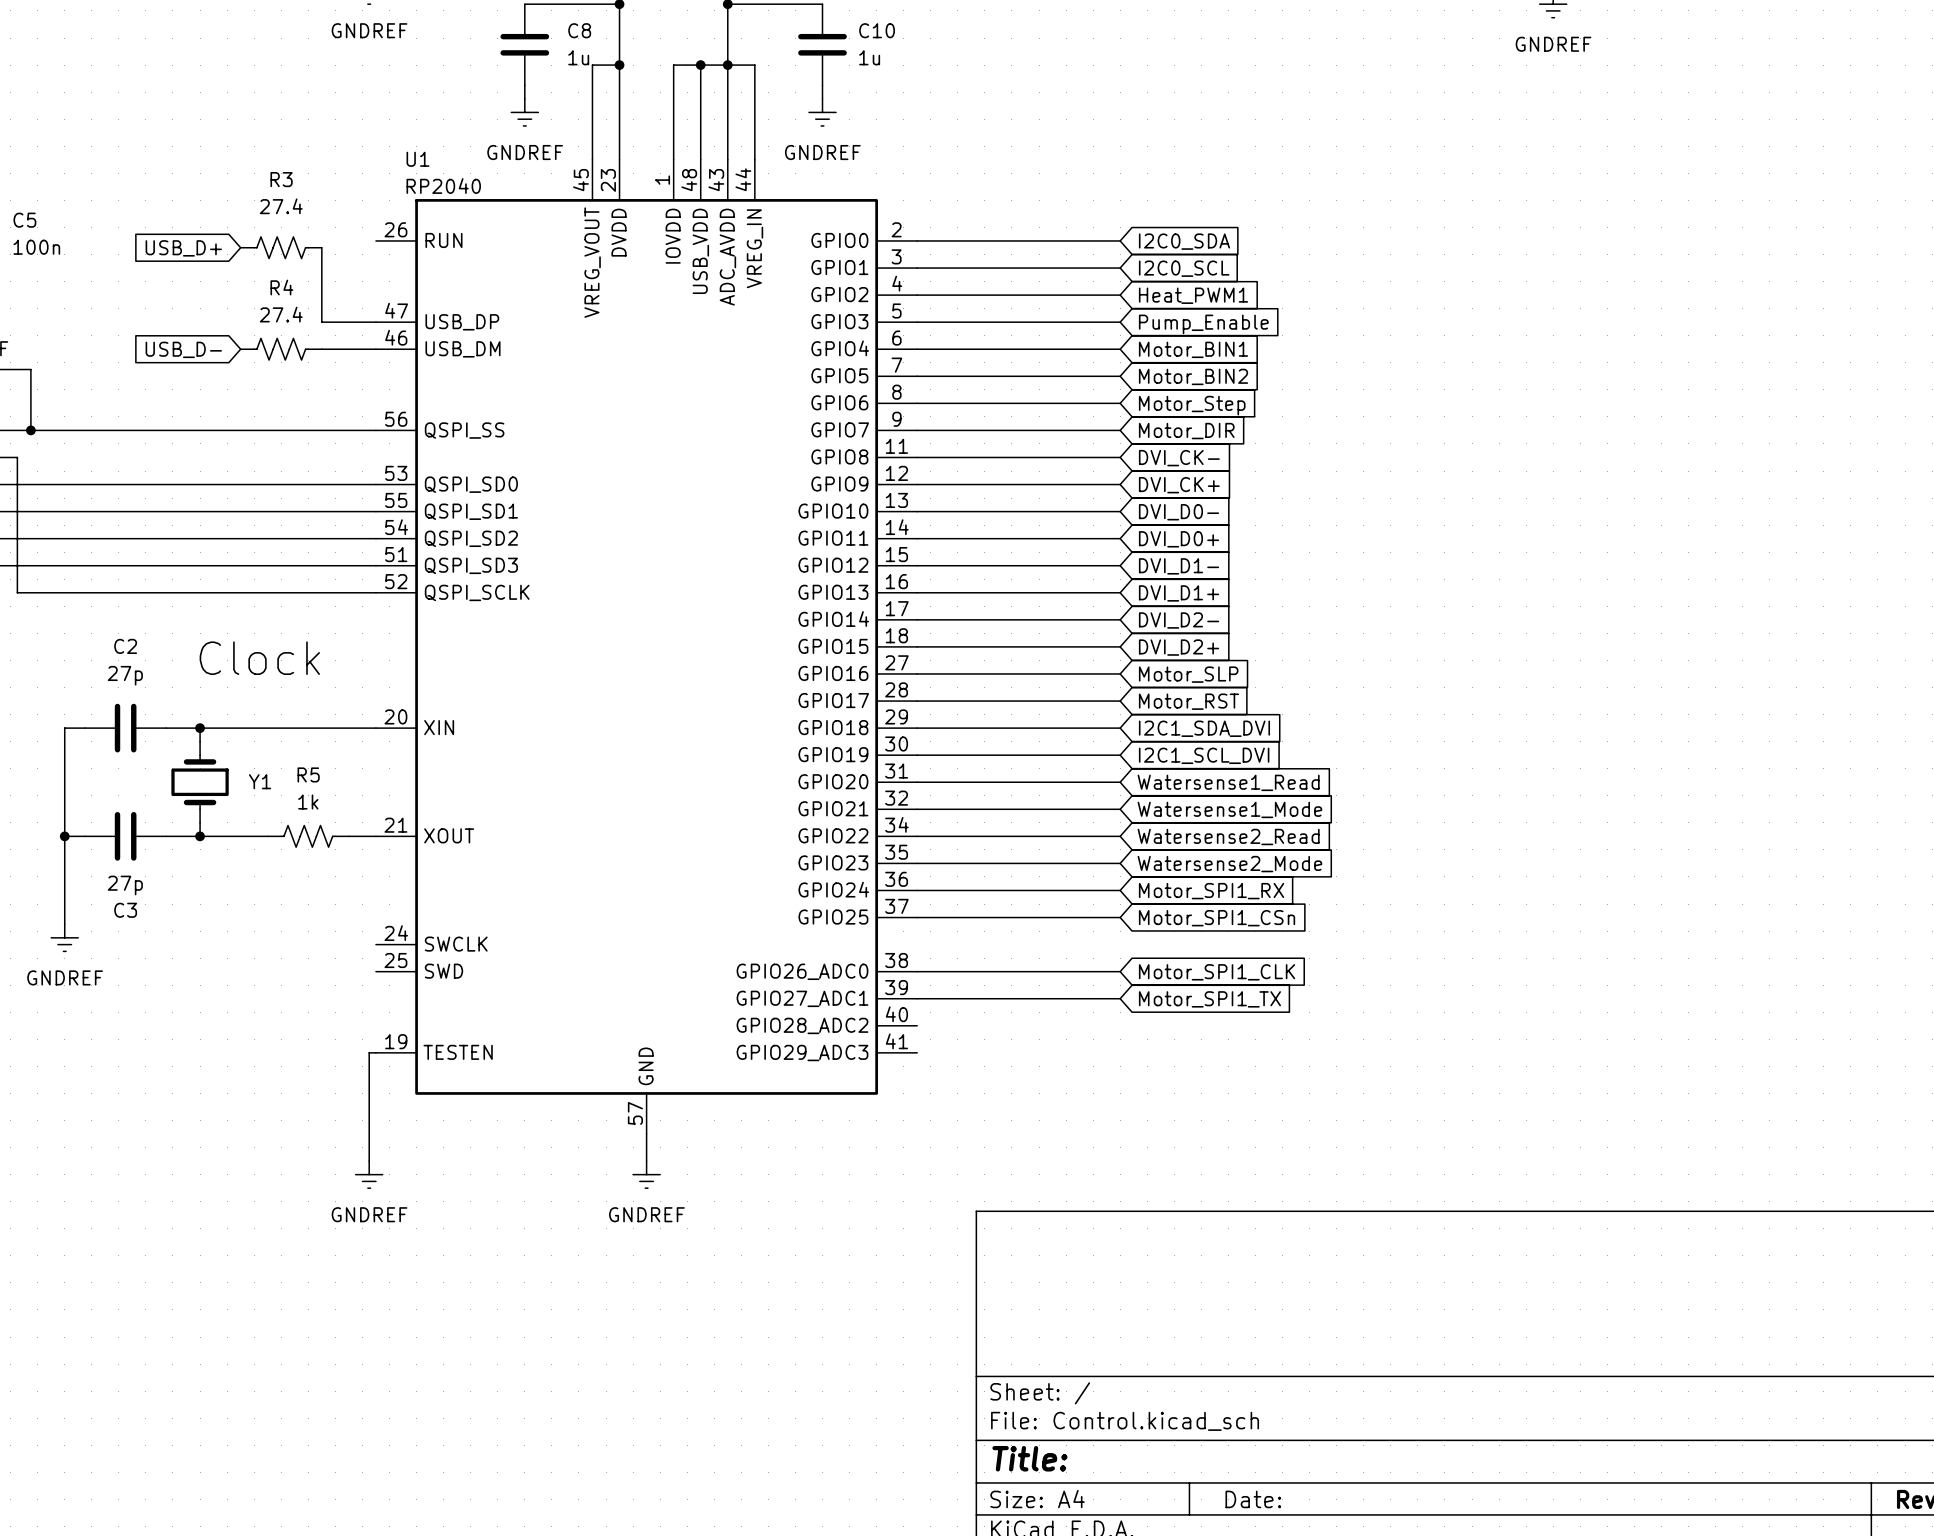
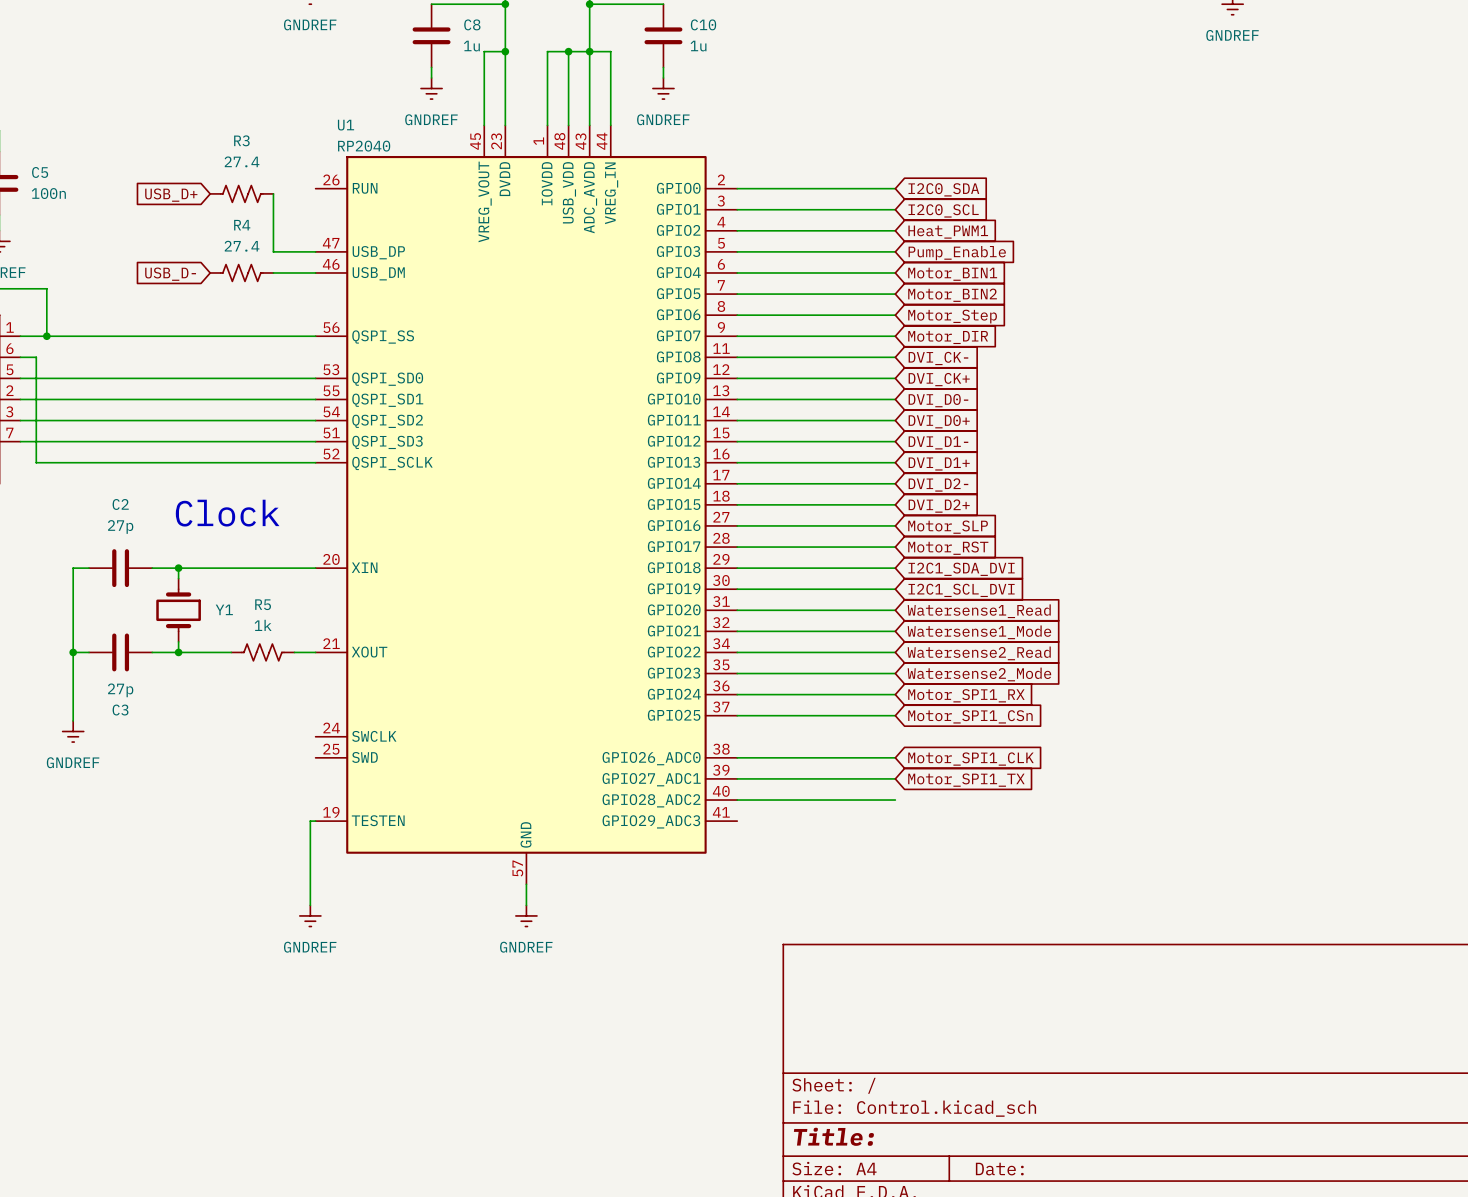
wire: none -> (737, 800) (895, 800)

